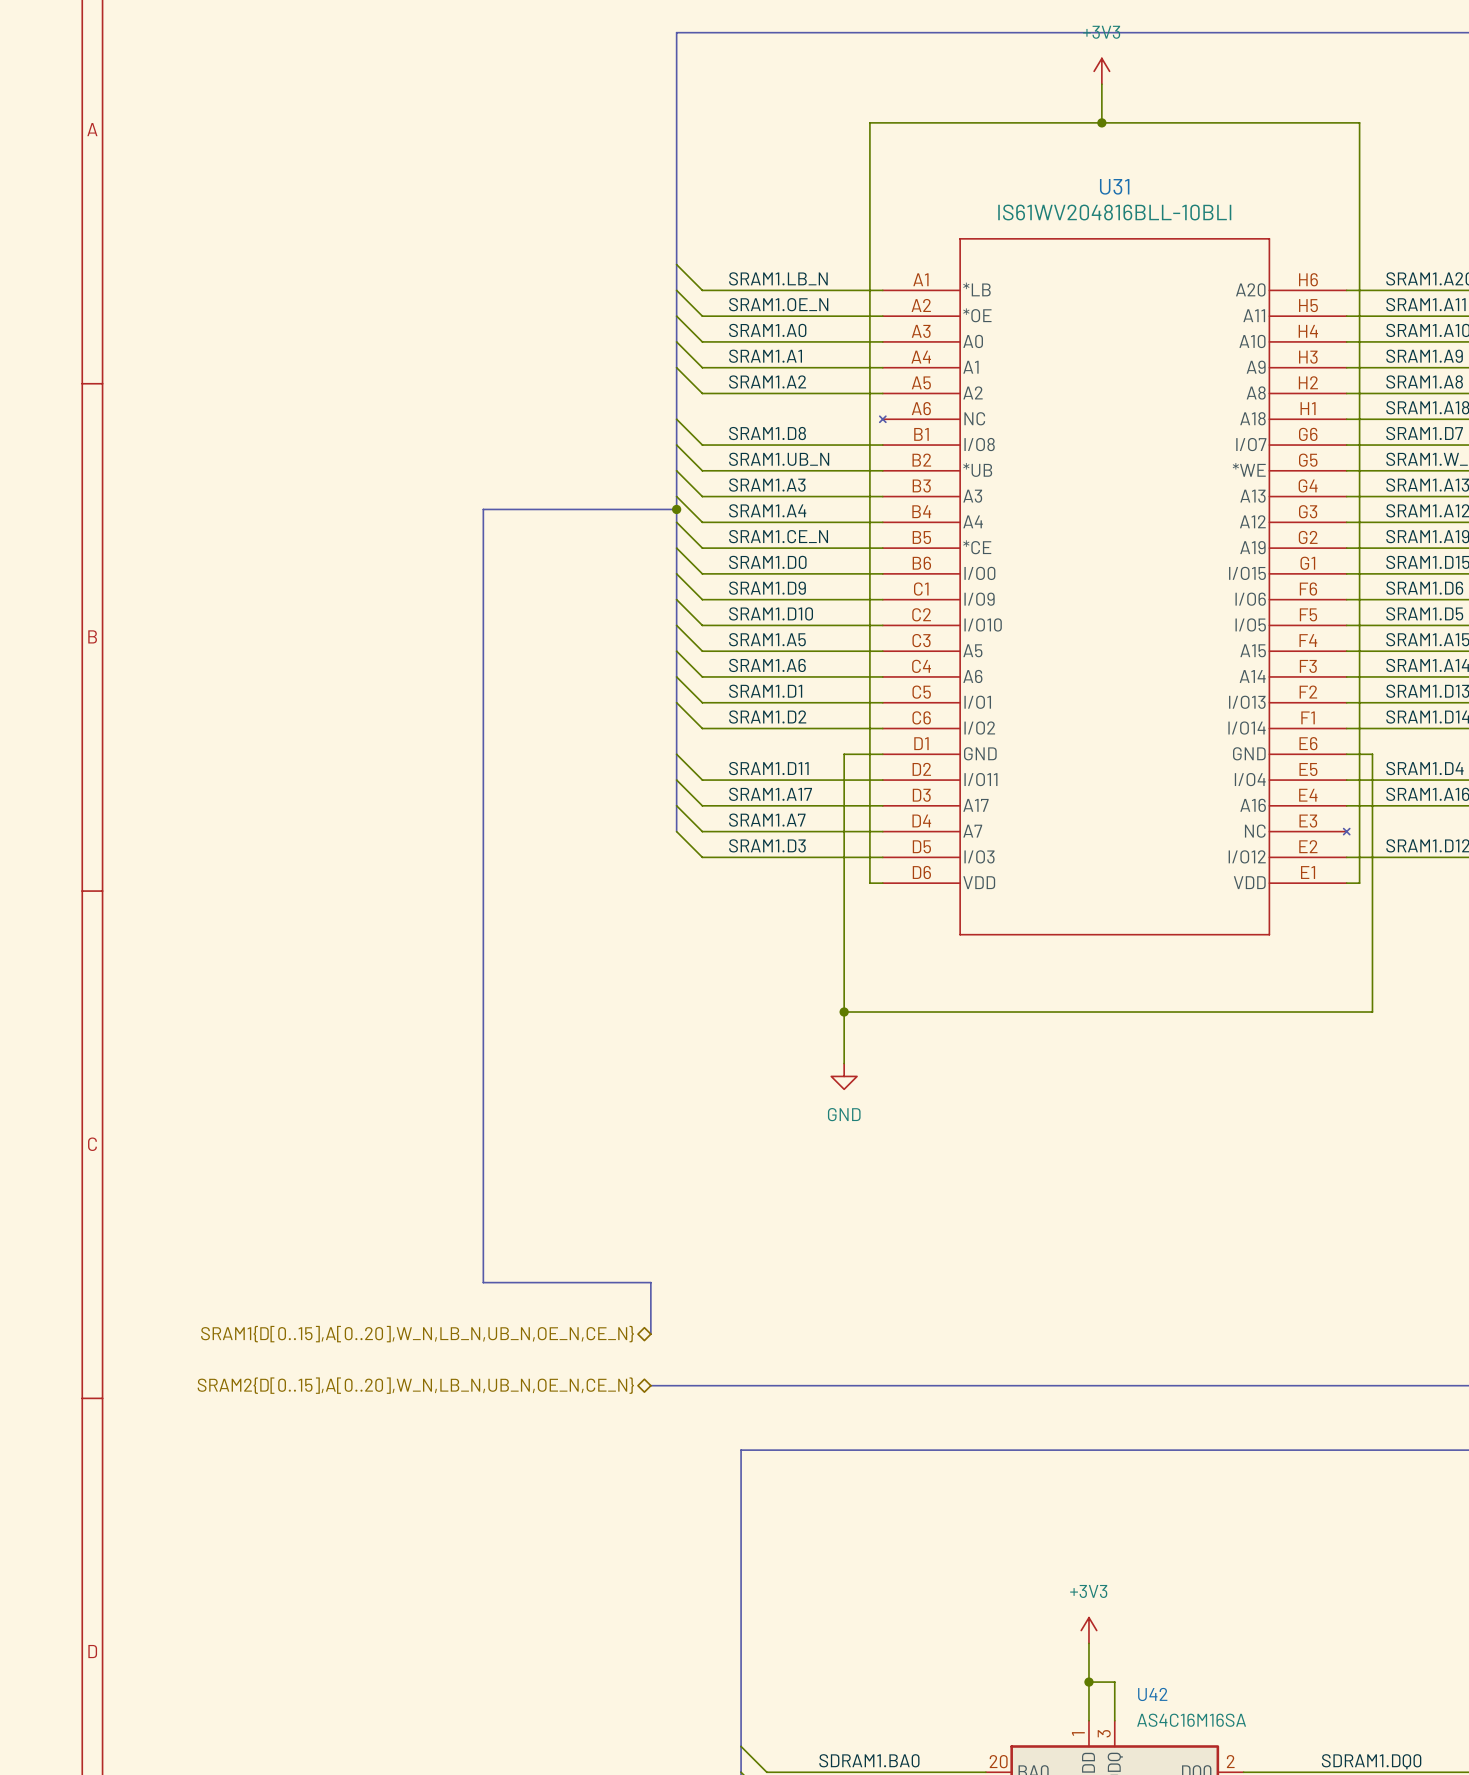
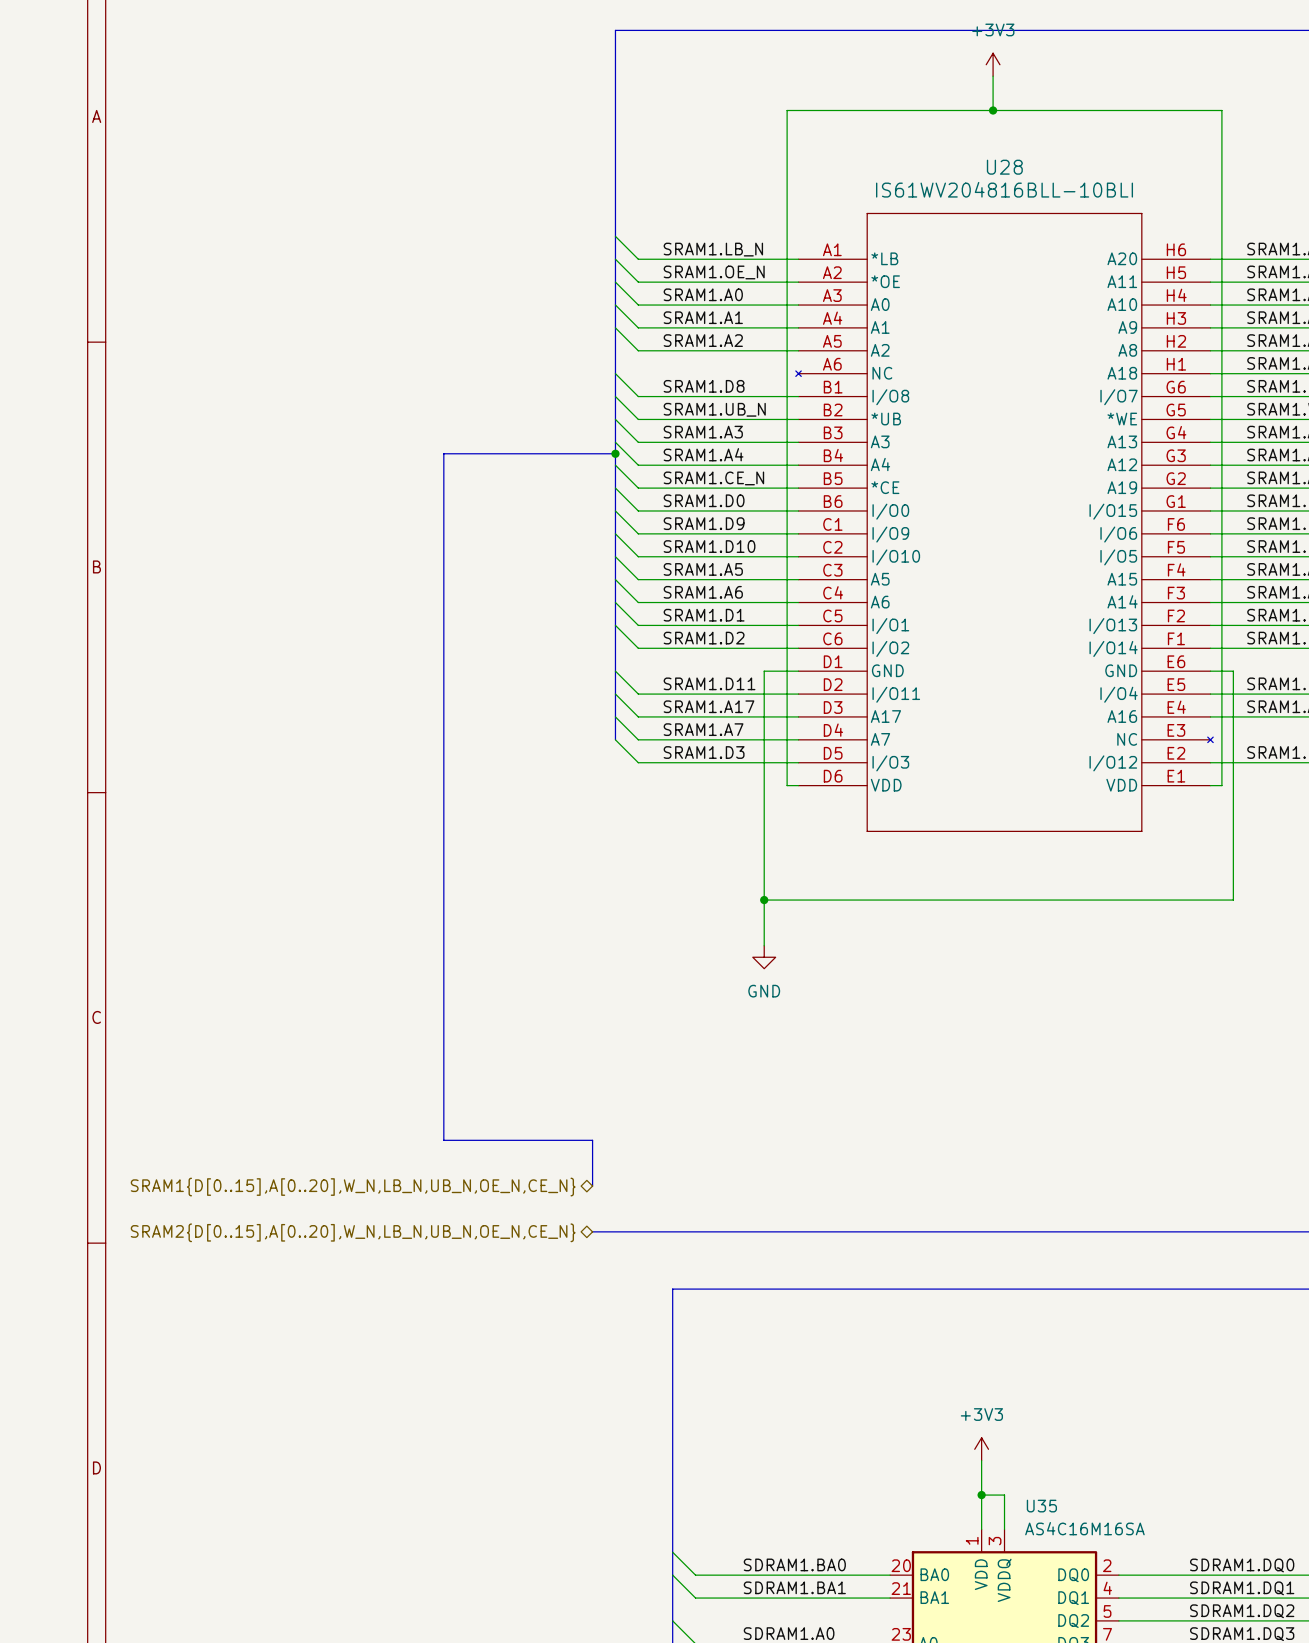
U31 name: U31 (1114, 186) -> U28 (1004, 167)
U42 name: U42 (1152, 1694) -> U35 (1041, 1506)

